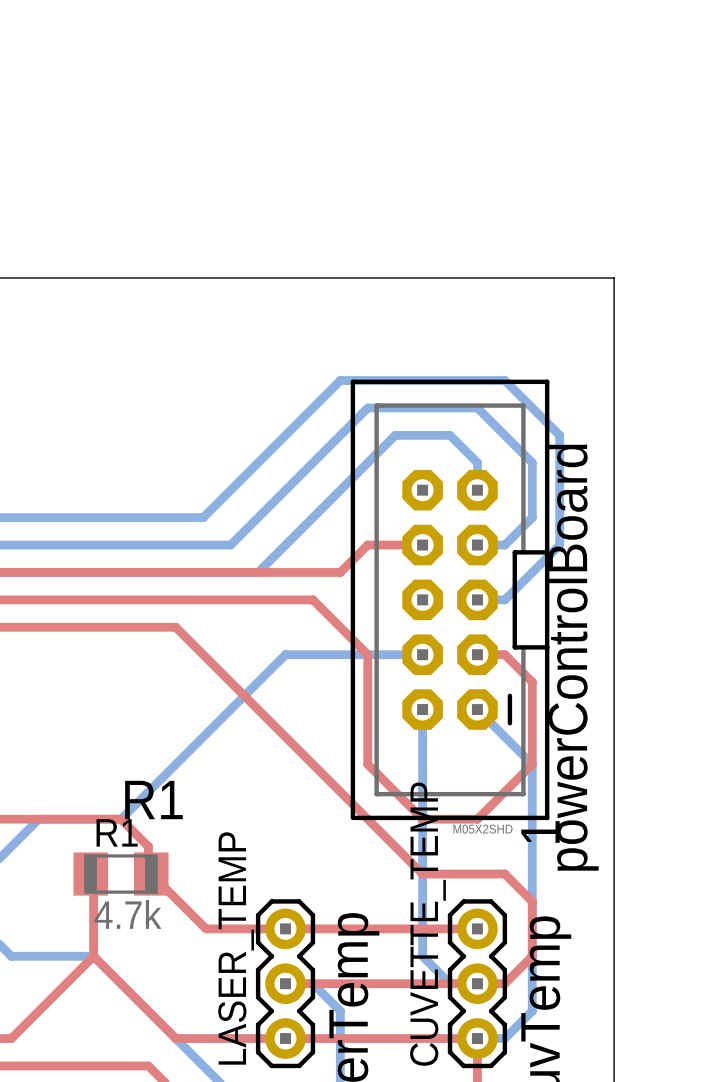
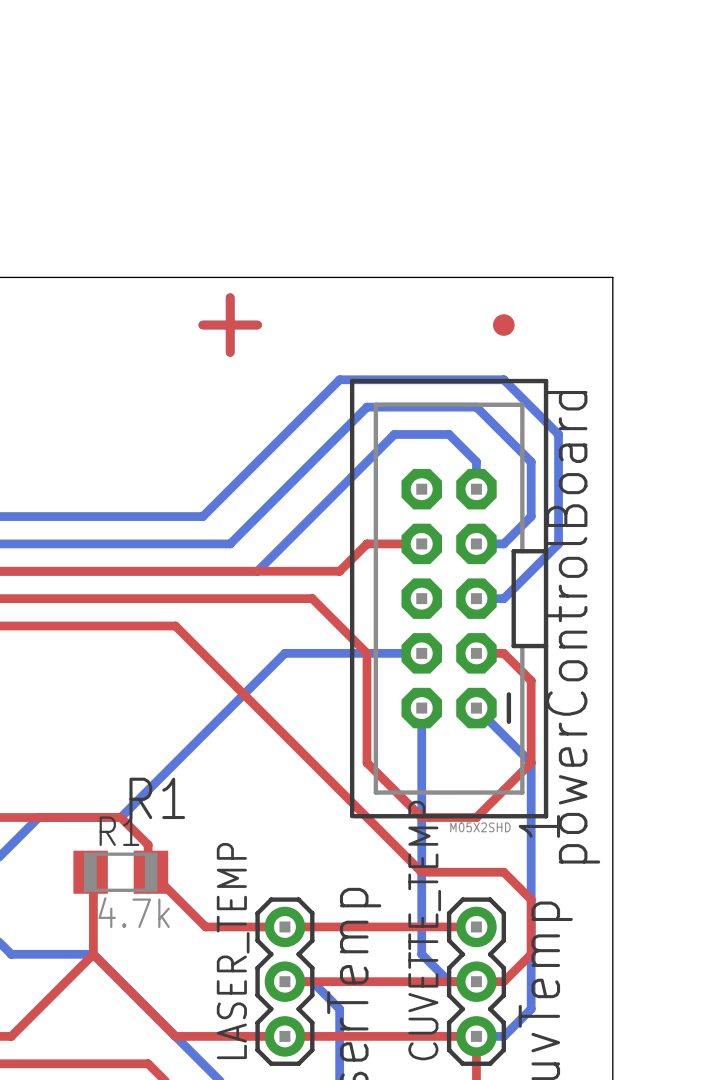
top track: none -> (230, 297) (230, 352)
top track: none -> (202, 325) (257, 325)
part: none -> (503, 325)

